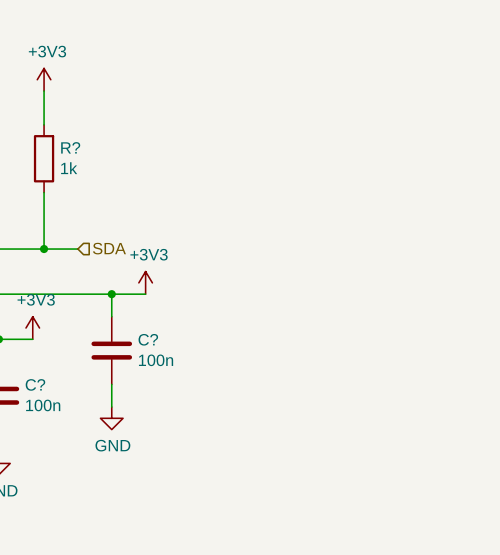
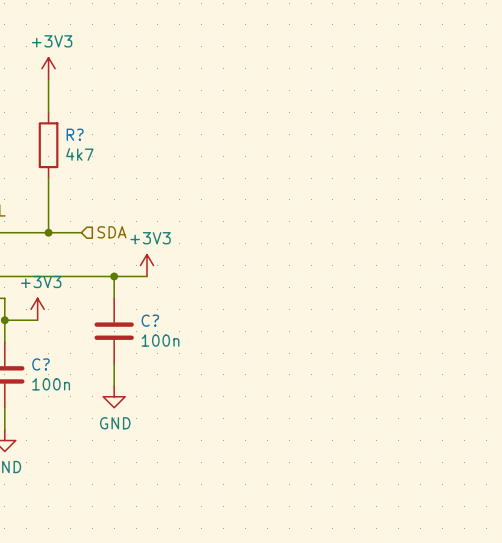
R? value: 1k (69, 168) -> 4k7 (79, 154)

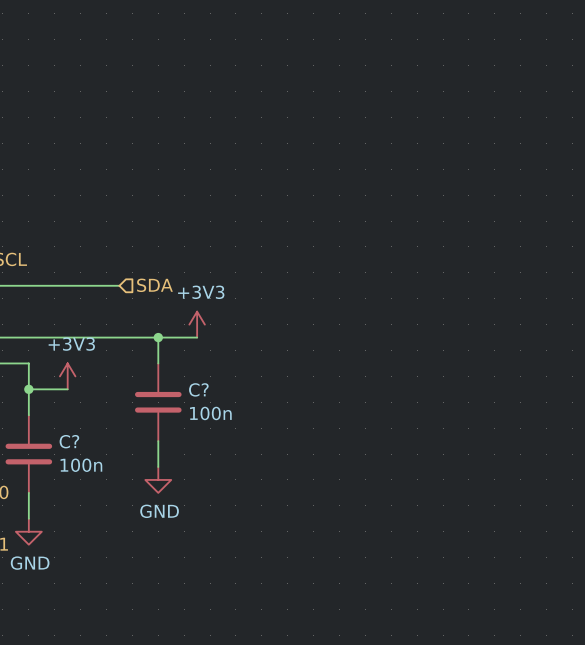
power symbol: +3V3 (48, 68) -> none
wire: (48, 79) (48, 112) -> none
R?: 4k7 (48, 145) -> none
wire: (48, 178) (48, 232) -> none
junction: (48, 232) -> none

